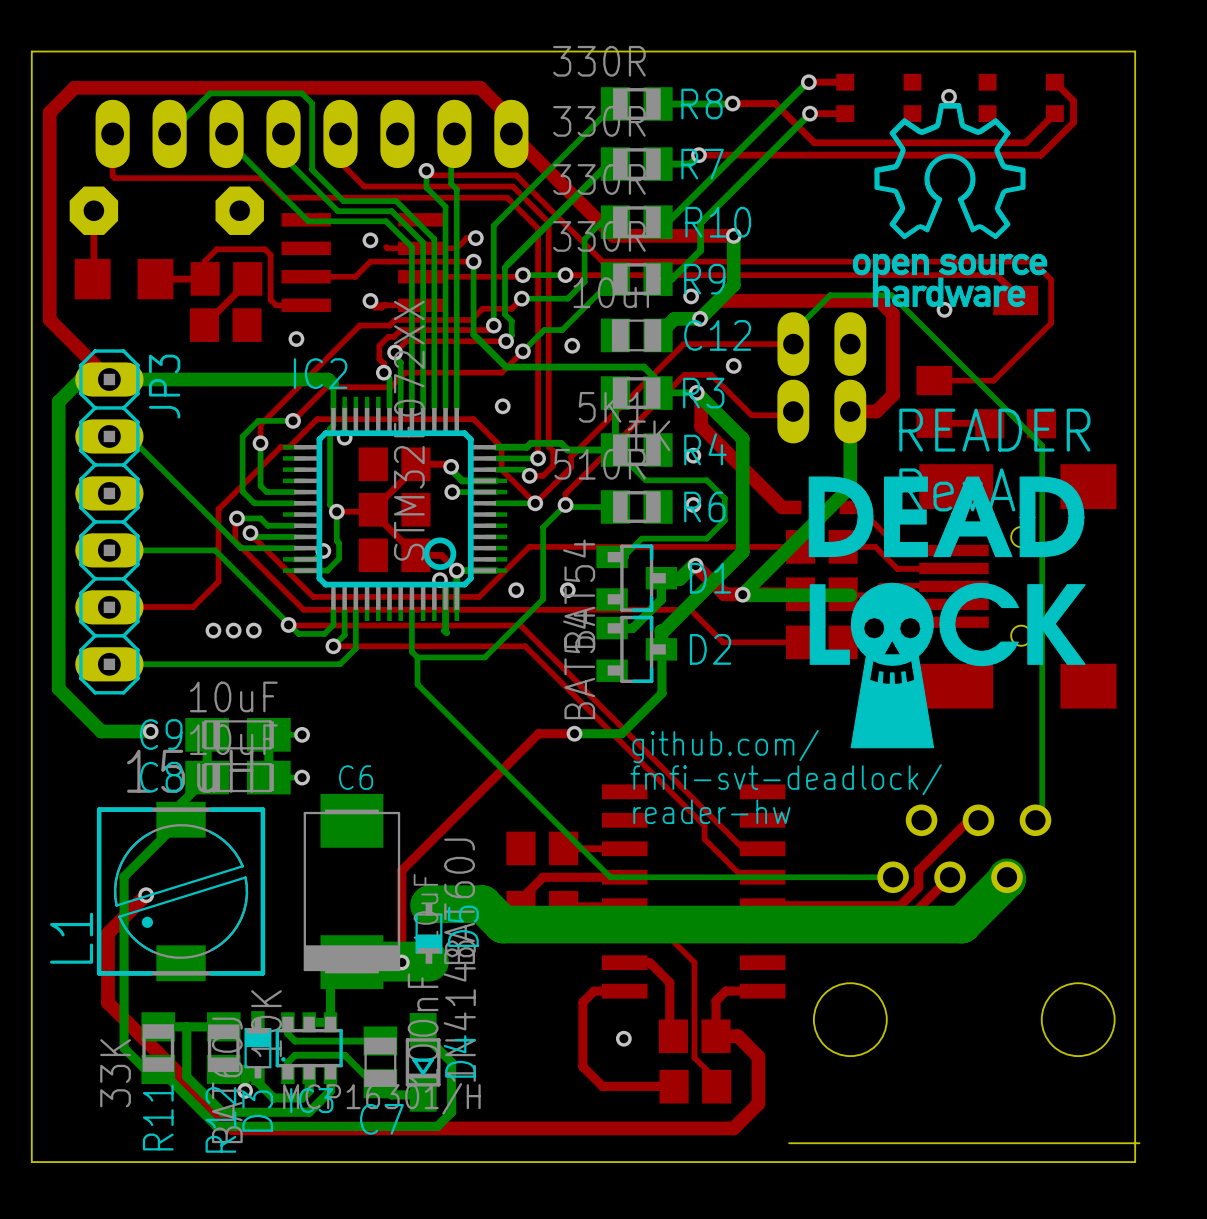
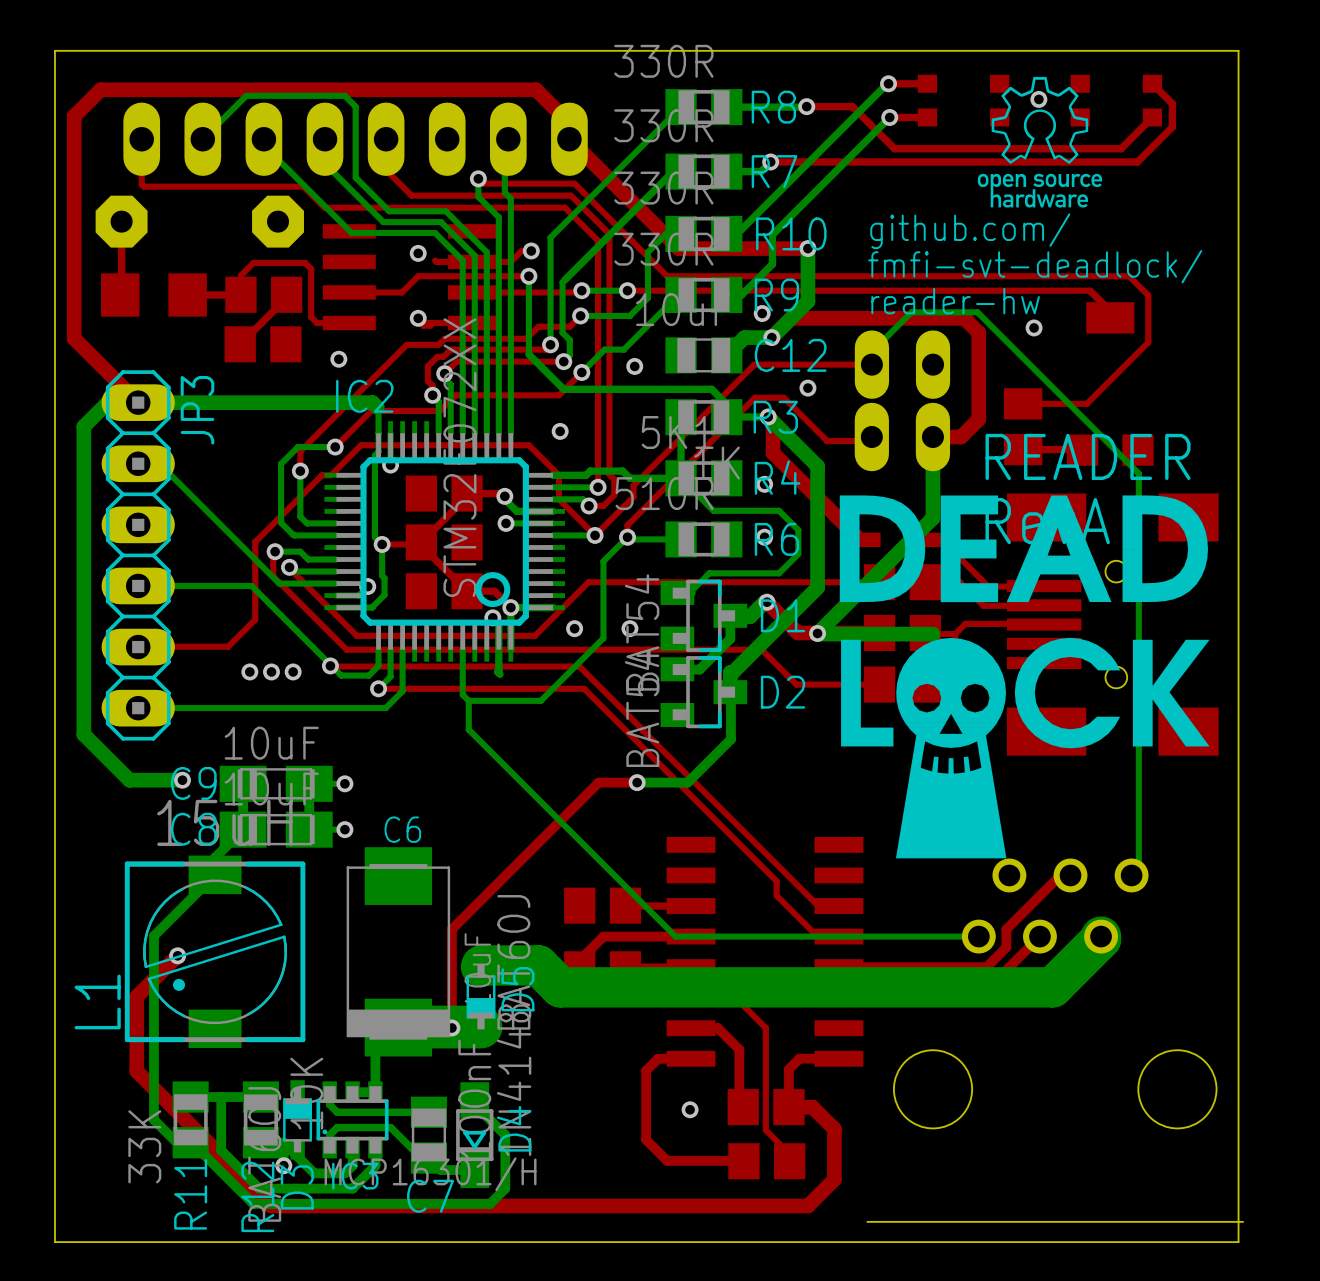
drawing: none -> [1001, 76, 1079, 102]
drawing shape: [889, 103, 1011, 142] -> [991, 101, 1089, 164]
drawing shape: [874, 140, 1026, 240] -> [1036, 194, 1042, 202]
drawing: none -> [977, 173, 1103, 208]
drawing: [852, 253, 1048, 308] -> none
drawing: none -> [839, 495, 926, 603]
drawing: [808, 476, 1086, 749] -> none
drawing shape: [884, 476, 928, 558] -> [940, 495, 999, 603]
drawing shape: [951, 476, 995, 514] -> [1031, 495, 1088, 544]
drawing shape: [1019, 476, 1085, 519] -> [1122, 495, 1208, 550]
drawing shape: [933, 512, 1013, 558] -> [1006, 543, 1112, 603]
drawing shape: [1019, 516, 1085, 558] -> [1122, 549, 1208, 603]
drawing: none -> [841, 637, 1210, 859]
text position: github.com/ (725, 746) -> github.com/ (970, 231)
text position: fmfi-svt-deadlock/ (786, 779) -> fmfi-svt-deadlock/ (1035, 266)
text position: reader-hw (711, 811) -> reader-hw (955, 301)

